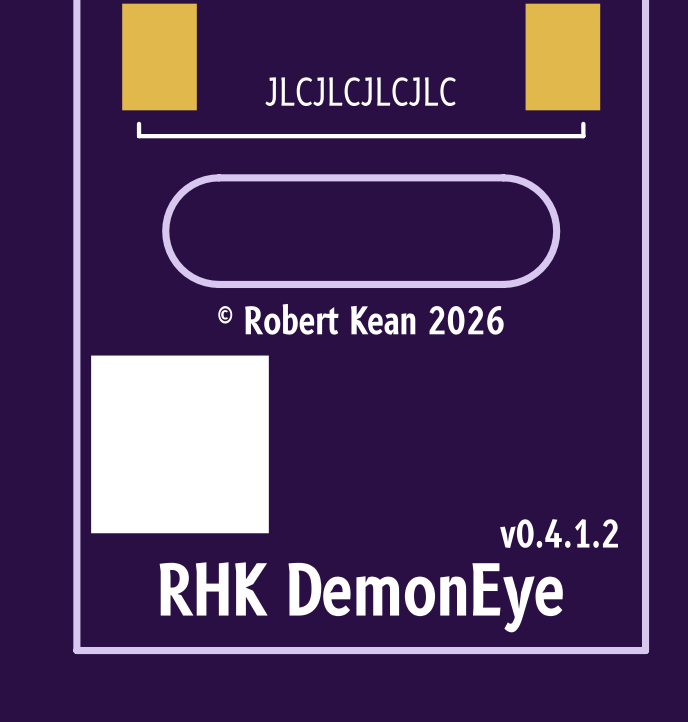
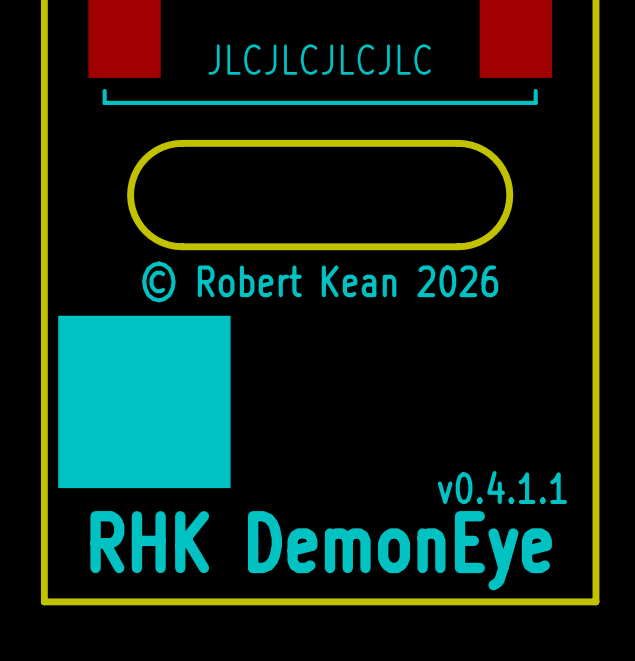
text: v0.4.1.2 (559, 533) -> v0.4.1.1 (502, 487)

